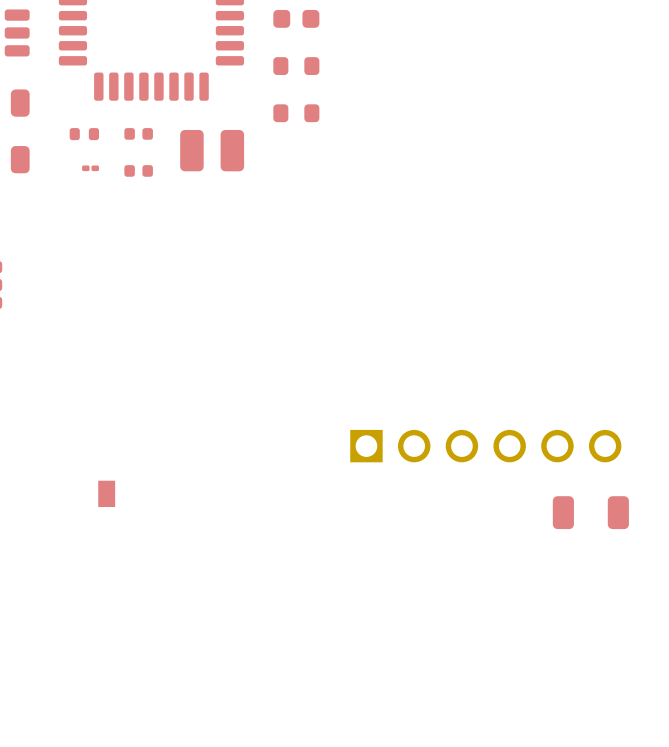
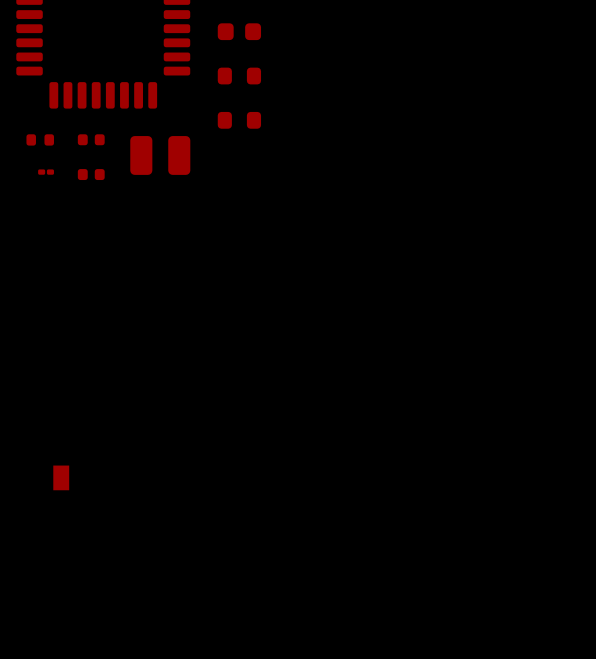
part: (485, 446) -> none
part: (590, 512) -> none

